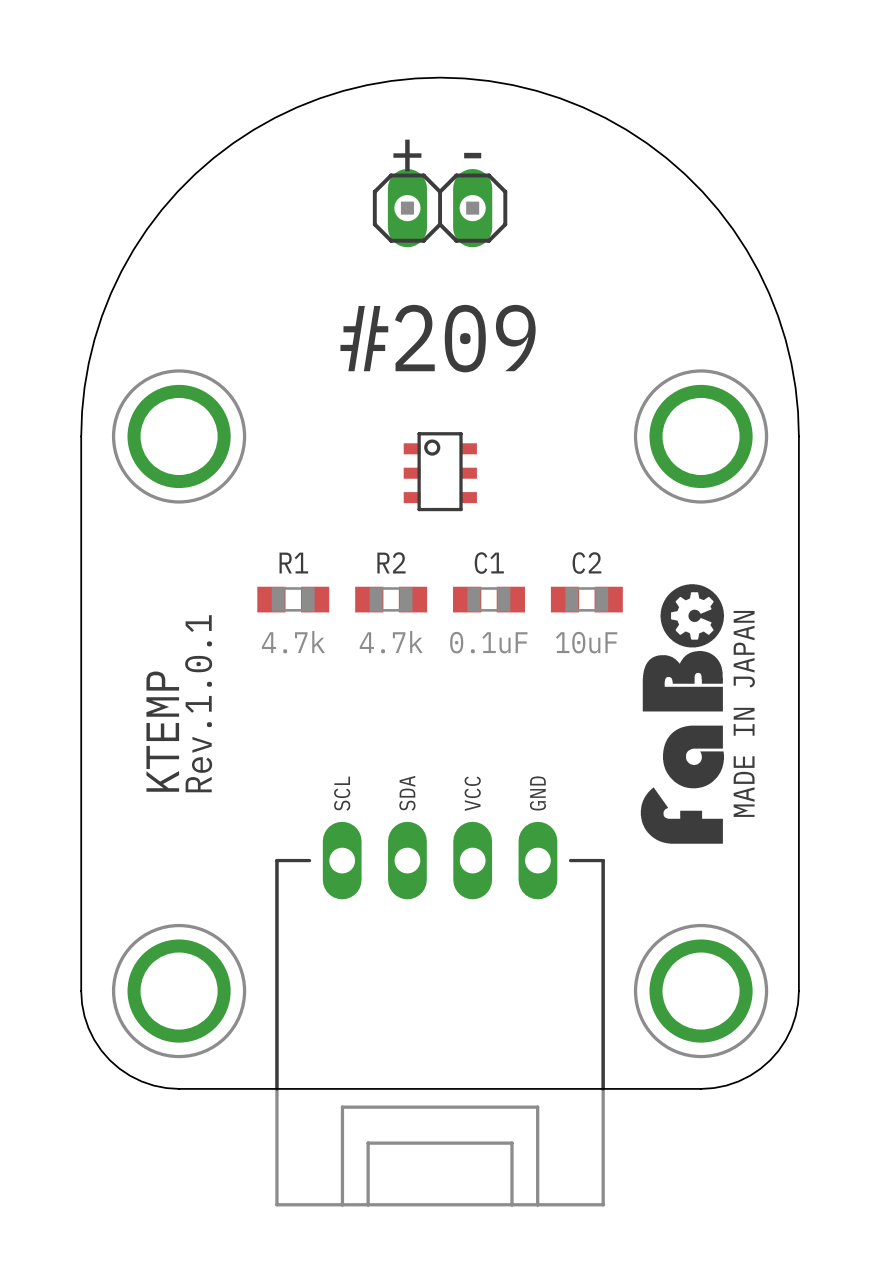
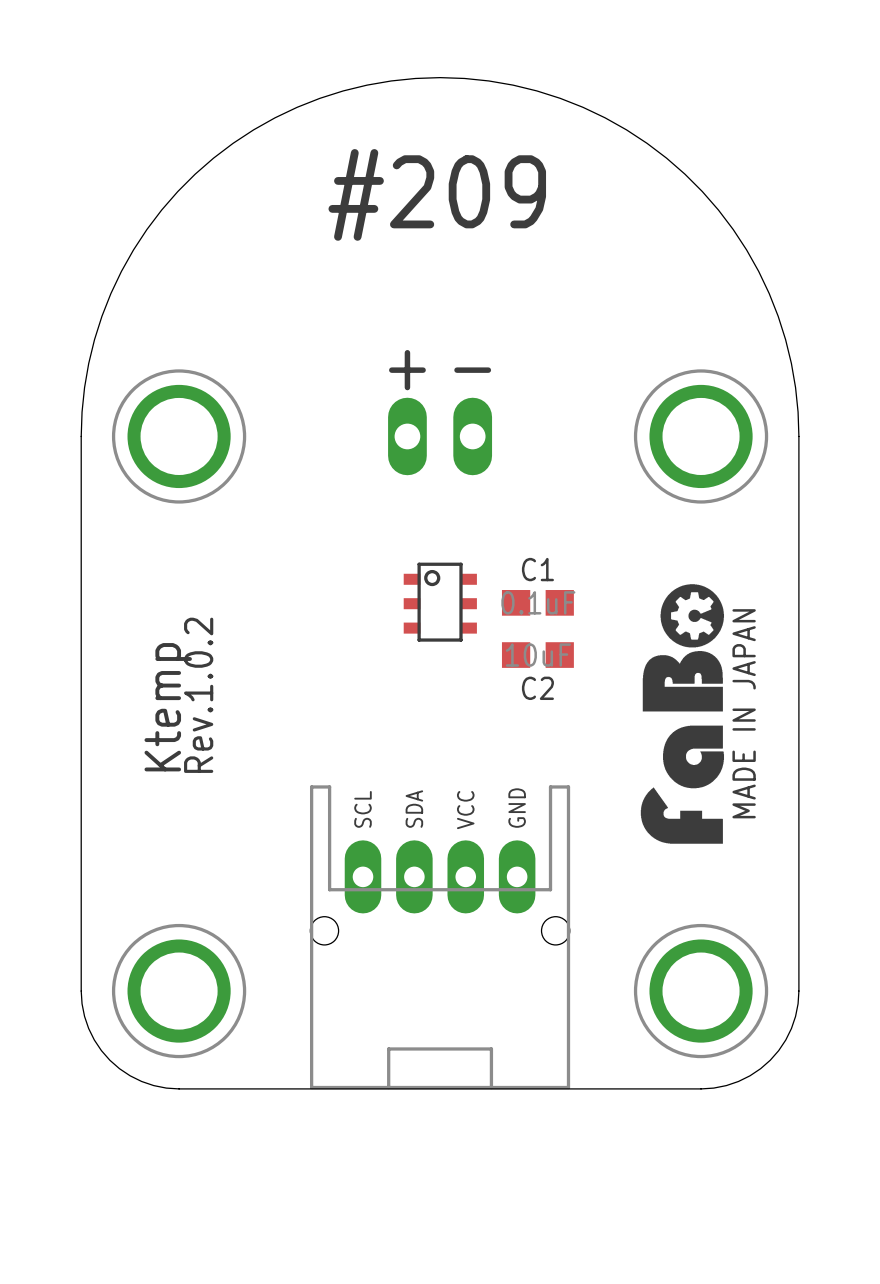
text position: + (407, 155) -> + (407, 370)
text position: - (472, 155) -> - (472, 370)
part: (440, 208) -> none
text position: #209 (438, 338) -> #209 (437, 194)
part: none -> (440, 436)
part position: (440, 471) -> (440, 602)
C2 name position: C2 (586, 563) -> C2 (537, 688)
part: none -> (440, 583)
C1 footprint: [453, 586, 525, 613] -> [501, 590, 574, 616]
C2 footprint: [550, 586, 623, 613] -> [501, 642, 574, 668]
R1: 4.7k (293, 599) -> none
R2: 4.7k (391, 599) -> none
part: (440, 642) -> none
text: Rev.1.0.1 (198, 703) -> Rev.1.0.2 (198, 695)
text: KTEMP (162, 731) -> Ktemp (168, 707)

